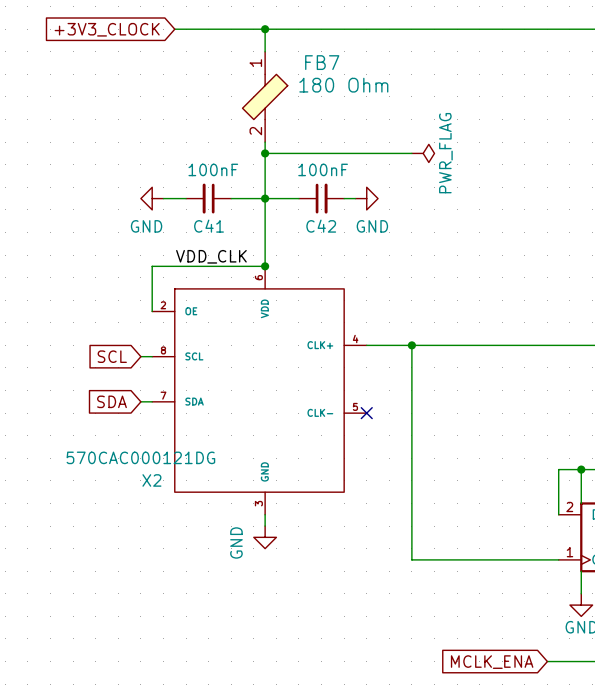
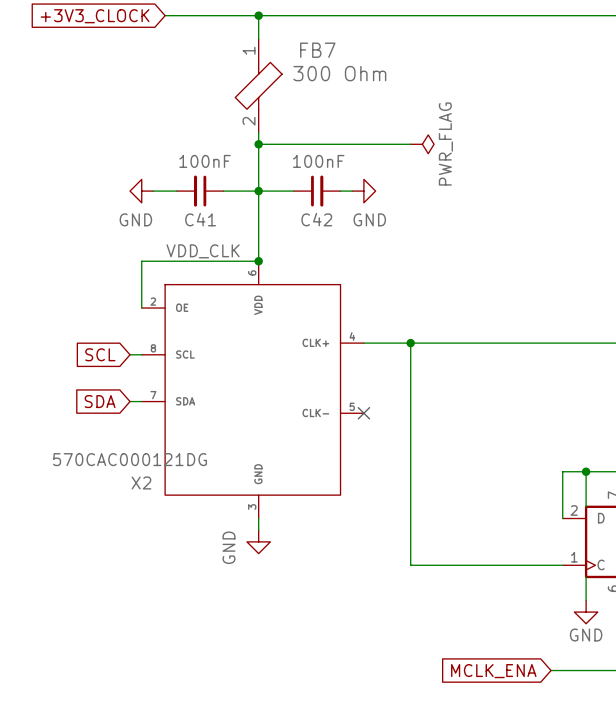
FB7 value: 180 Ohm (343, 85) -> 300 Ohm (339, 73)

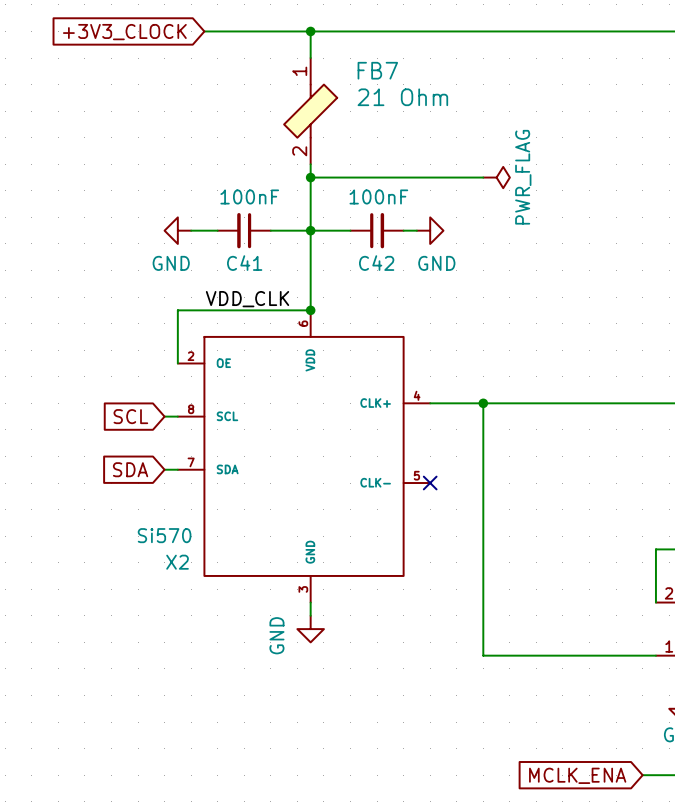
FB7 value: 300 Ohm (339, 73) -> 21 Ohm (402, 97)
X2 value: 570CAC000121DG (130, 459) -> Si570 (164, 535)

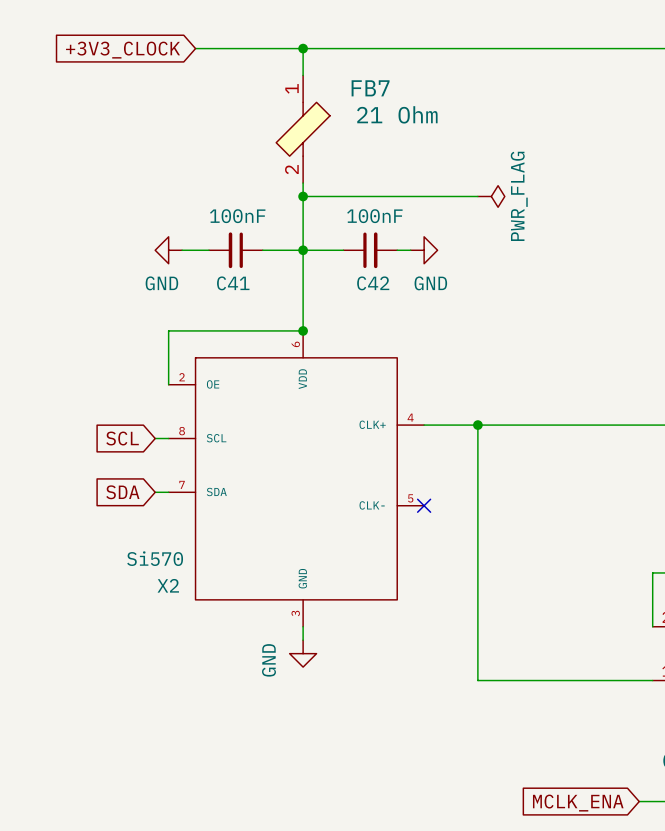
label: VDD_CLK (247, 299) -> none

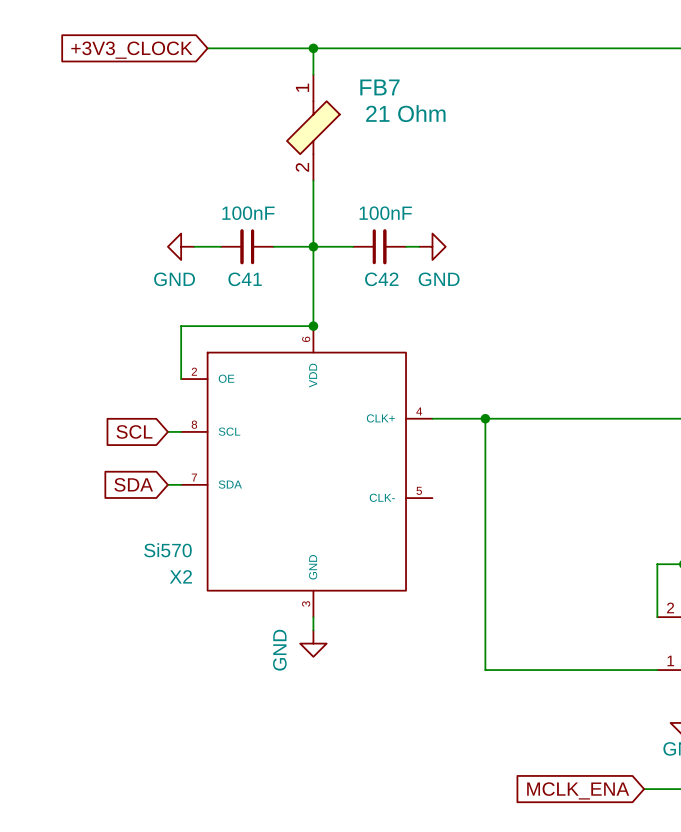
wire: (303, 196) (477, 196) -> none
junction: (303, 196) -> none
power symbol: PWR_FLAG (491, 196) -> none
no-connect mark: (424, 505) -> none

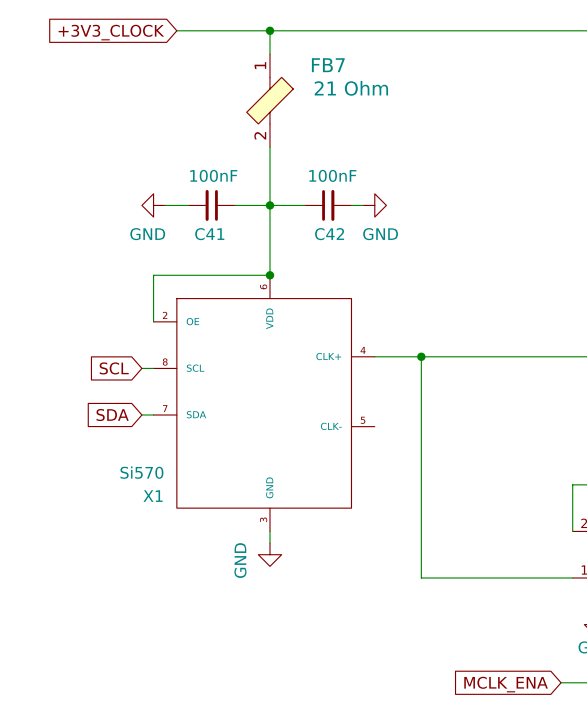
X2 name: X2 (180, 576) -> X1 (153, 496)

